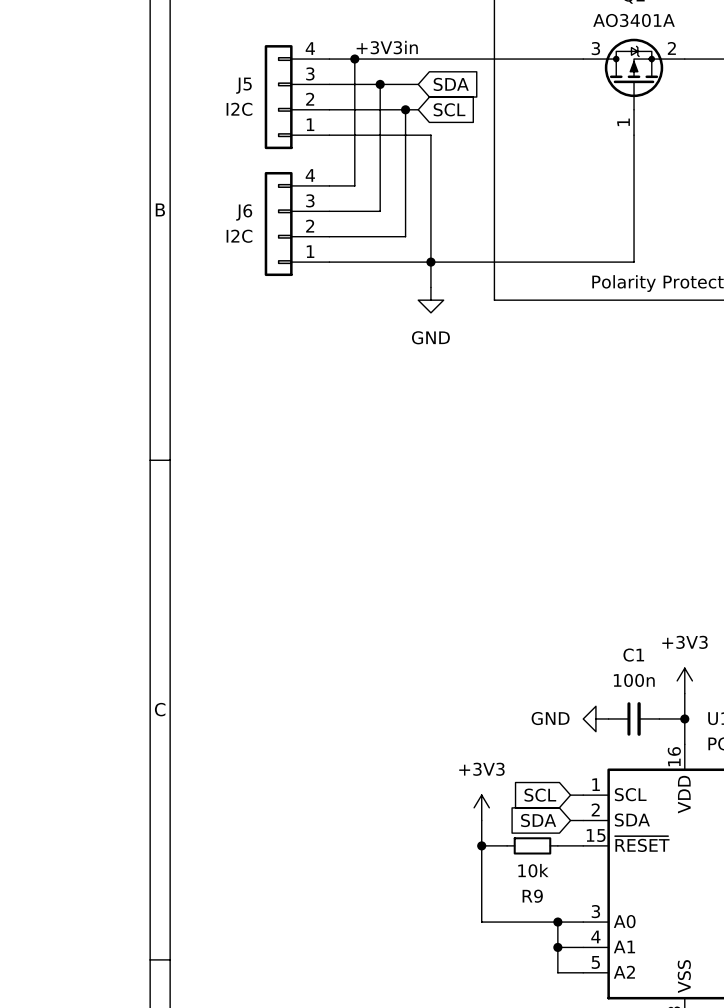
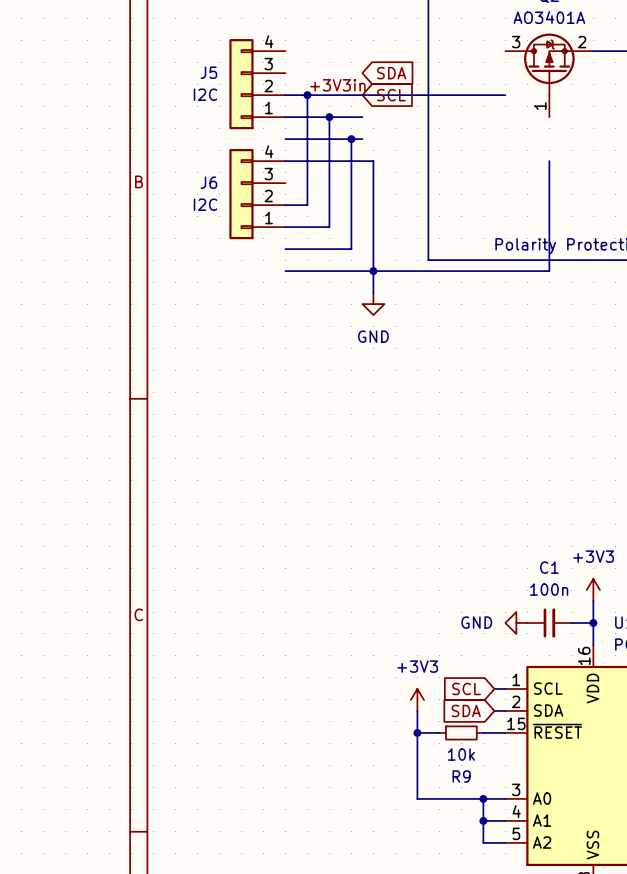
label position: +3V3in (387, 47) -> +3V3in (337, 85)
wire: (329, 59) (583, 59) -> none
wire: (354, 59) (354, 109) -> none
junction: (354, 59) -> none
wire: (329, 84) (418, 84) -> (285, 139) (362, 139)
wire: (380, 84) (380, 135) -> none
junction: (380, 84) -> none
junction: none -> (307, 95)
wire: (405, 109) (405, 160) -> (373, 249) (373, 293)
junction: (405, 109) -> none
wire: none -> (362, 95) (505, 95)
junction: none -> (329, 117)
wire: (418, 135) (430, 135) (430, 185) -> none
wire: (634, 135) (634, 185) -> none
junction: none -> (351, 139)
wire: (329, 211) (380, 211) -> (329, 227) (329, 183)
wire: (354, 236) (405, 236) -> (307, 205) (307, 161) (373, 161)
wire: none -> (351, 205) (351, 249) (285, 249)
wire: (380, 262) (634, 262) -> (285, 271) (549, 271) (549, 227)
junction position: (430, 262) -> (373, 271)
power symbol position: GND (430, 300) -> GND (373, 304)

